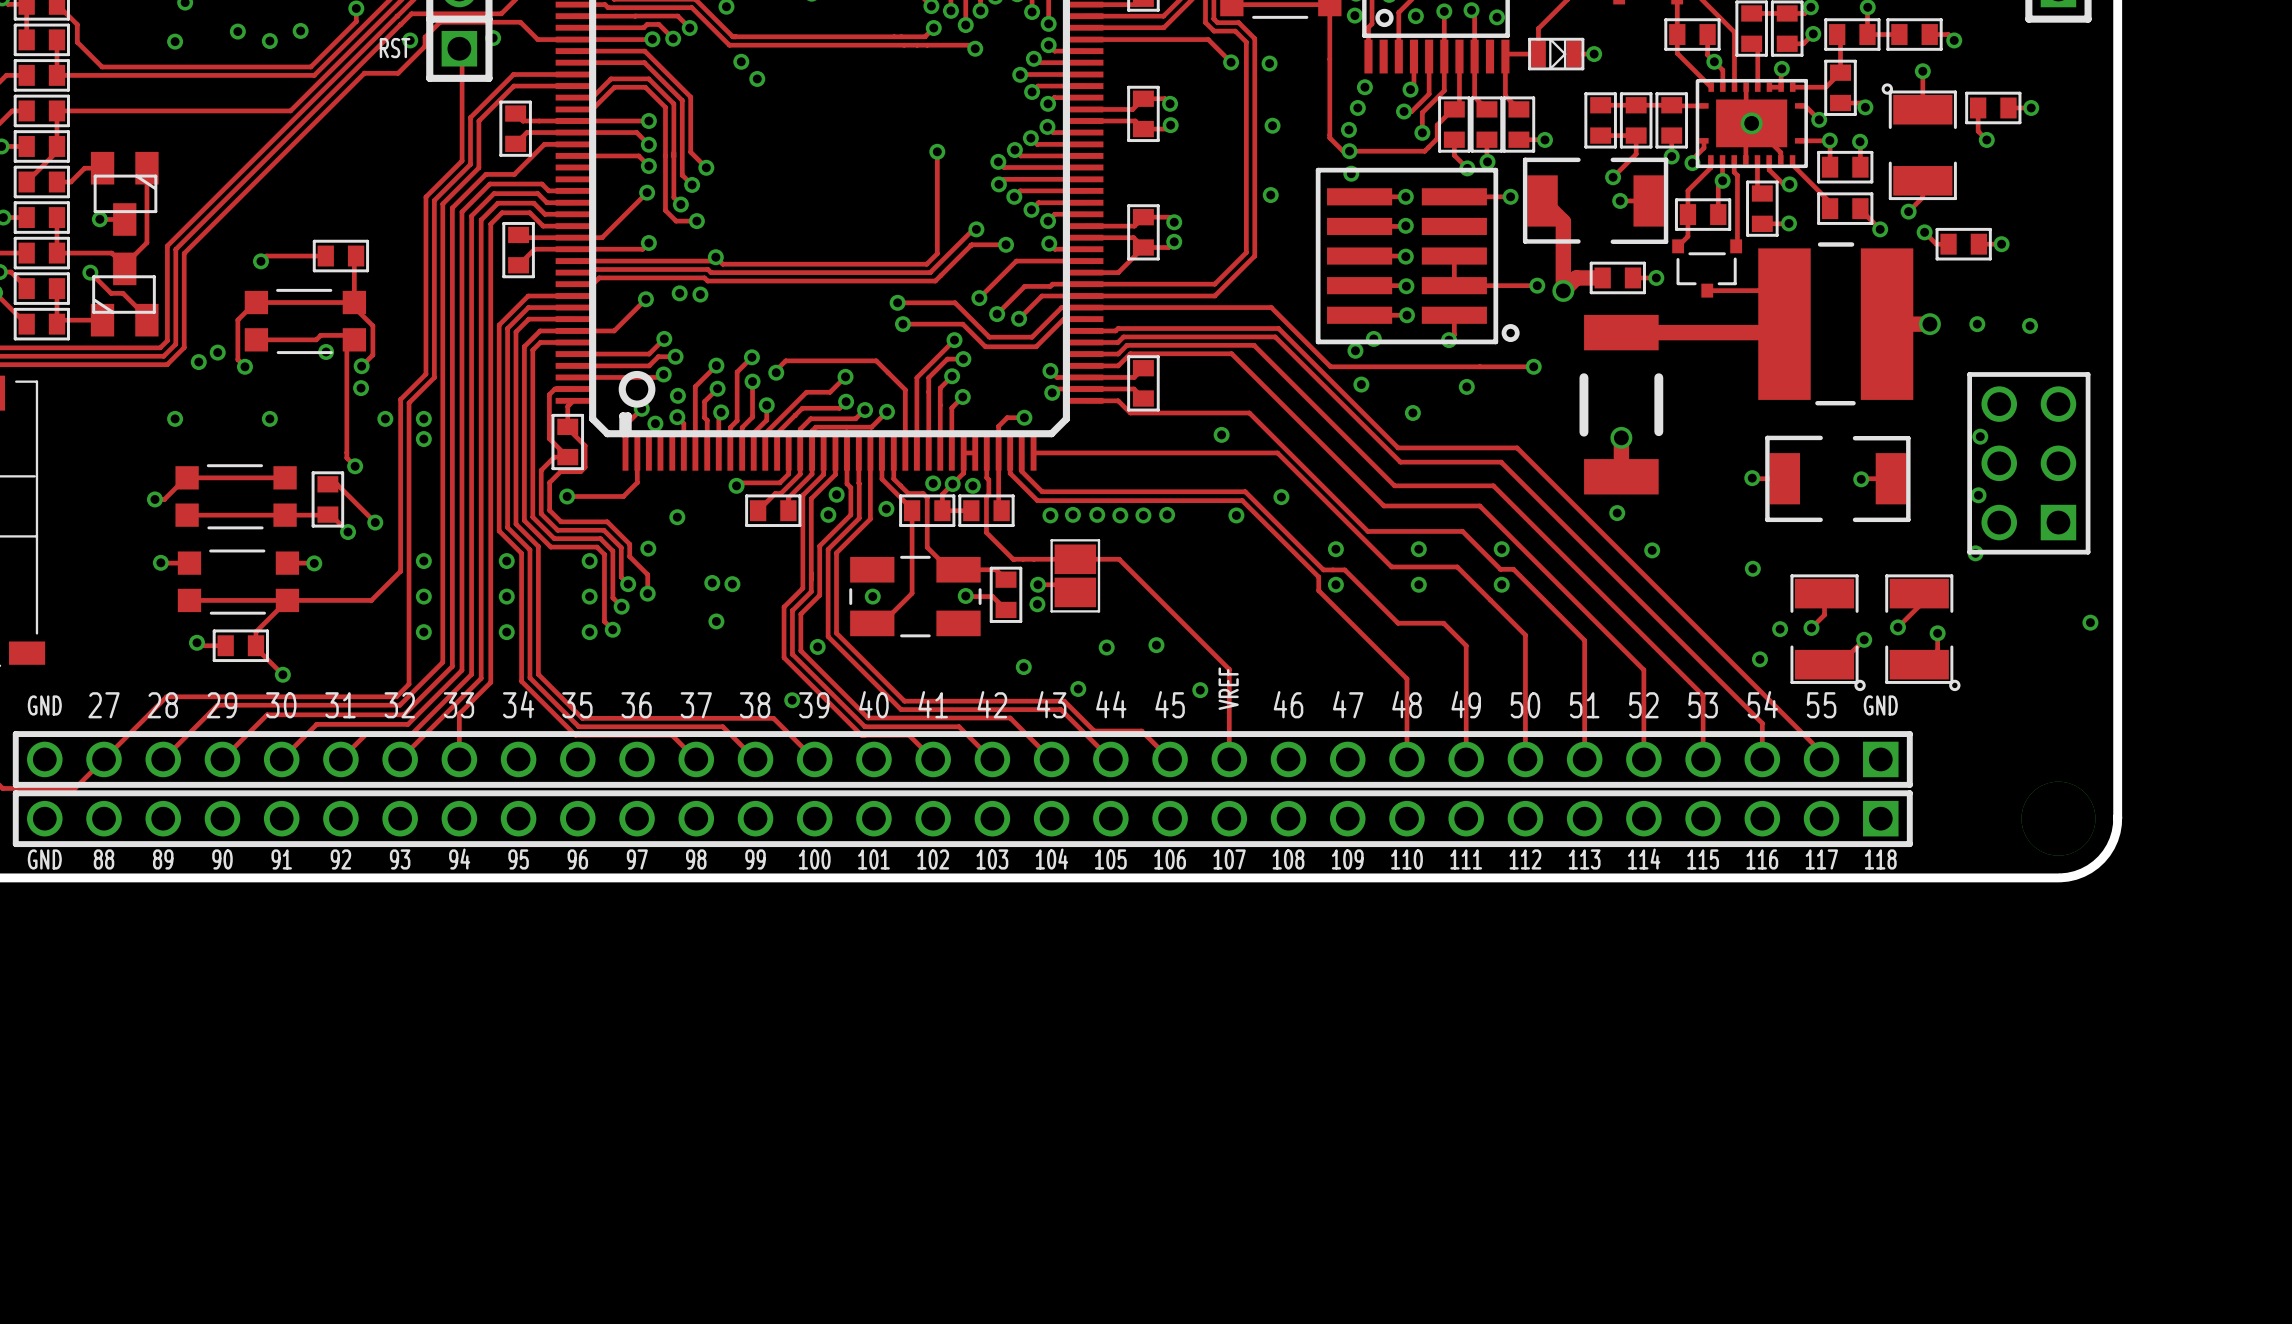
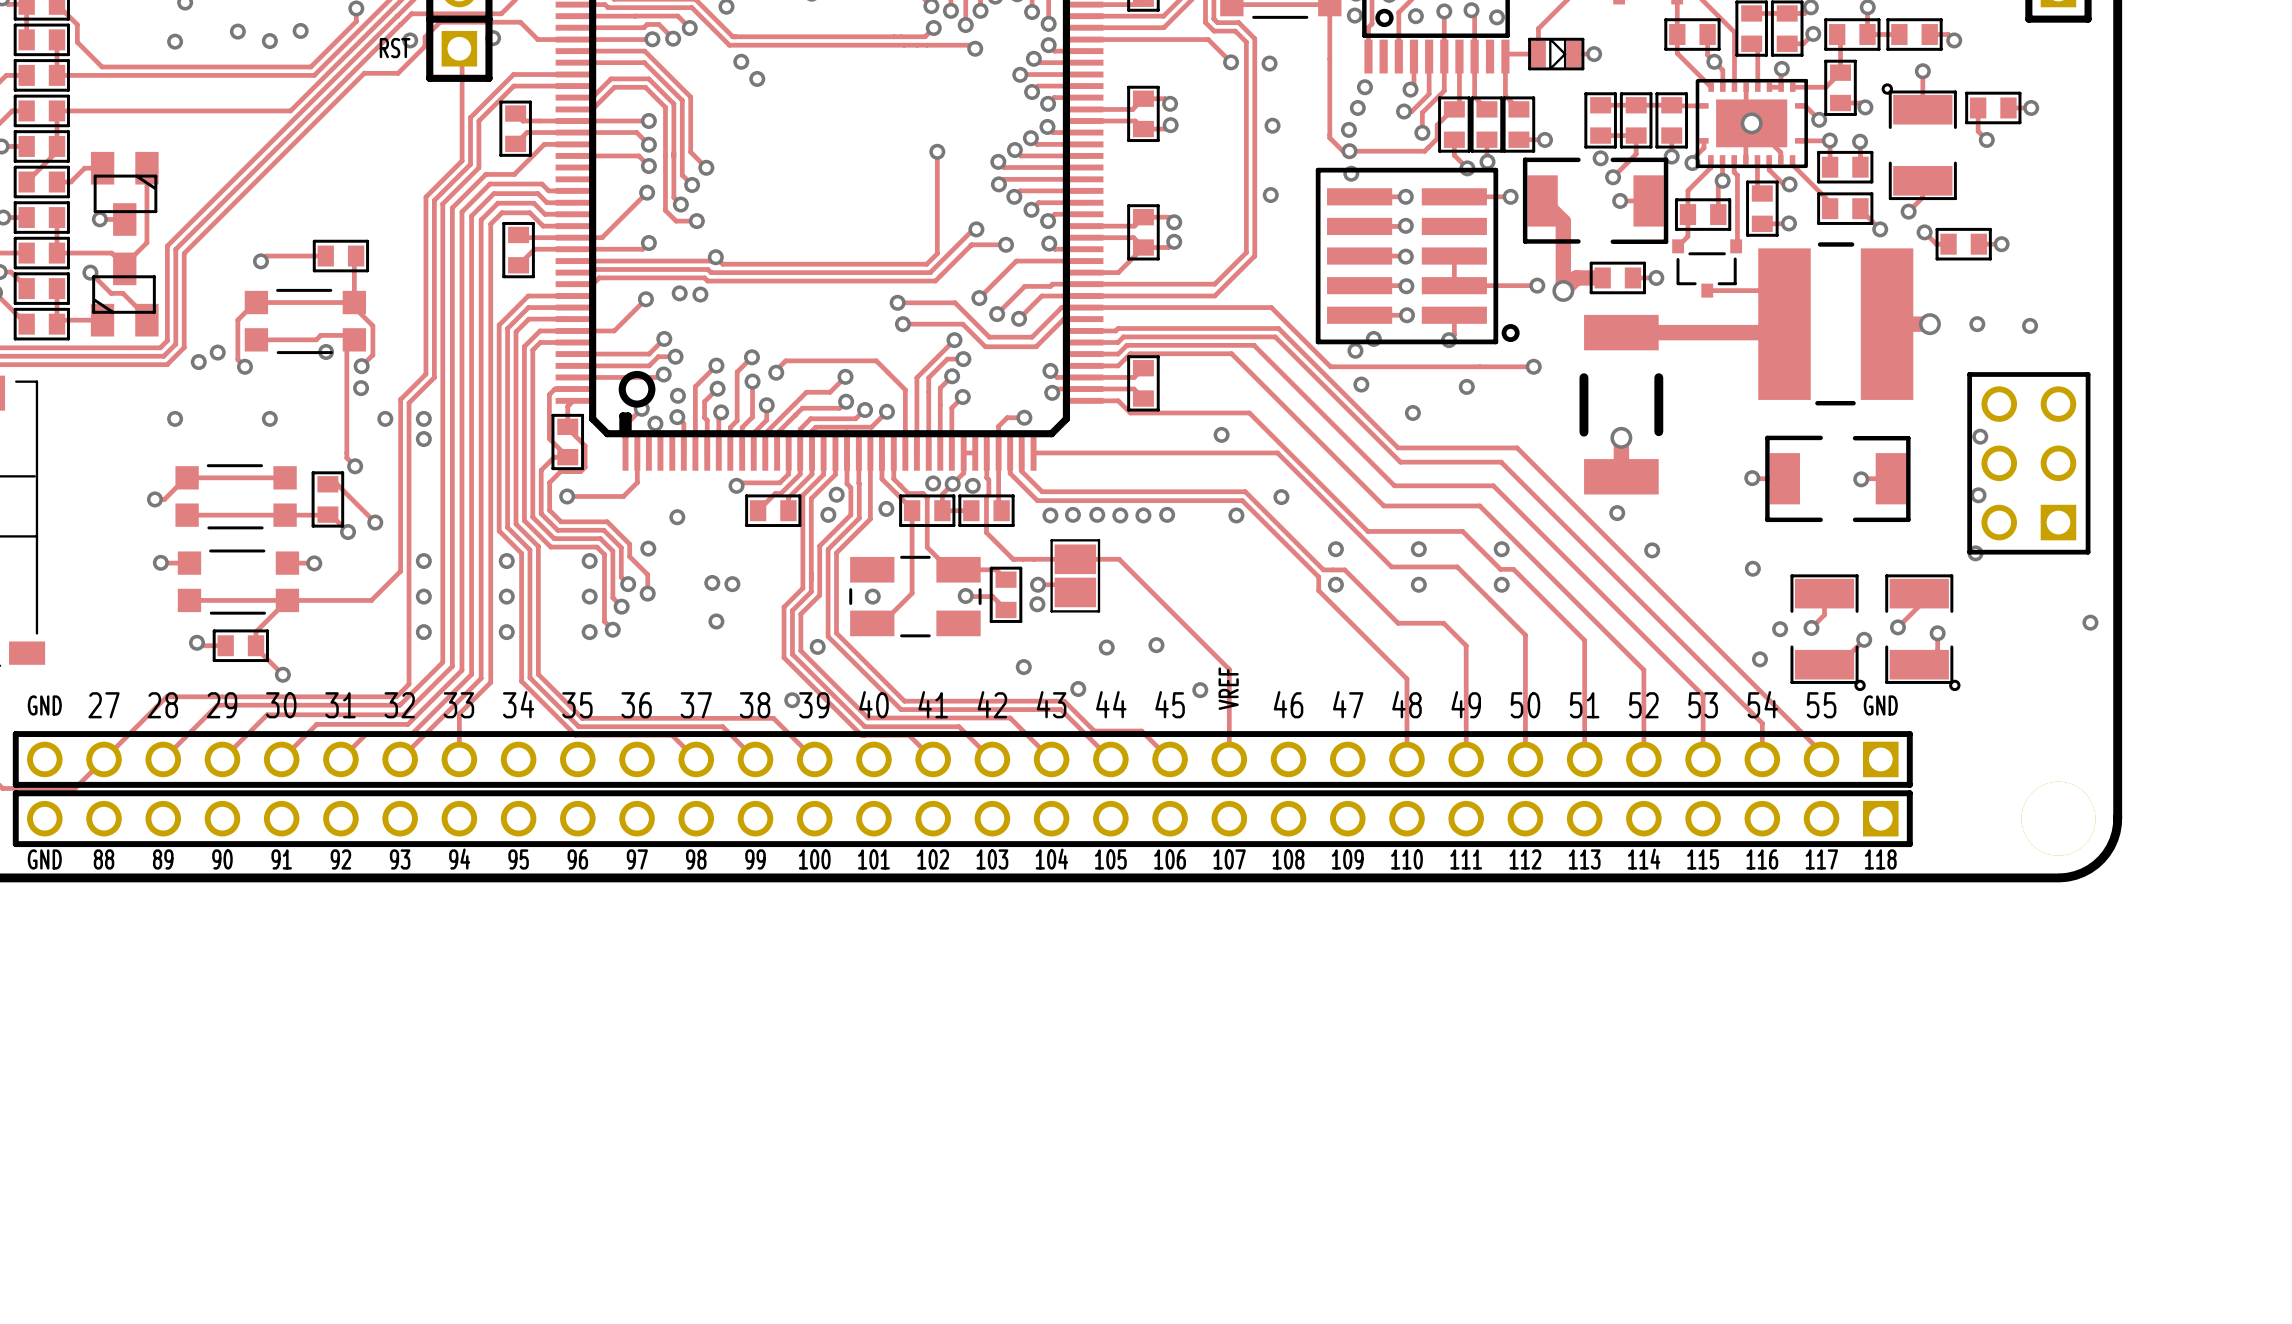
via: none -> (1600, 158)

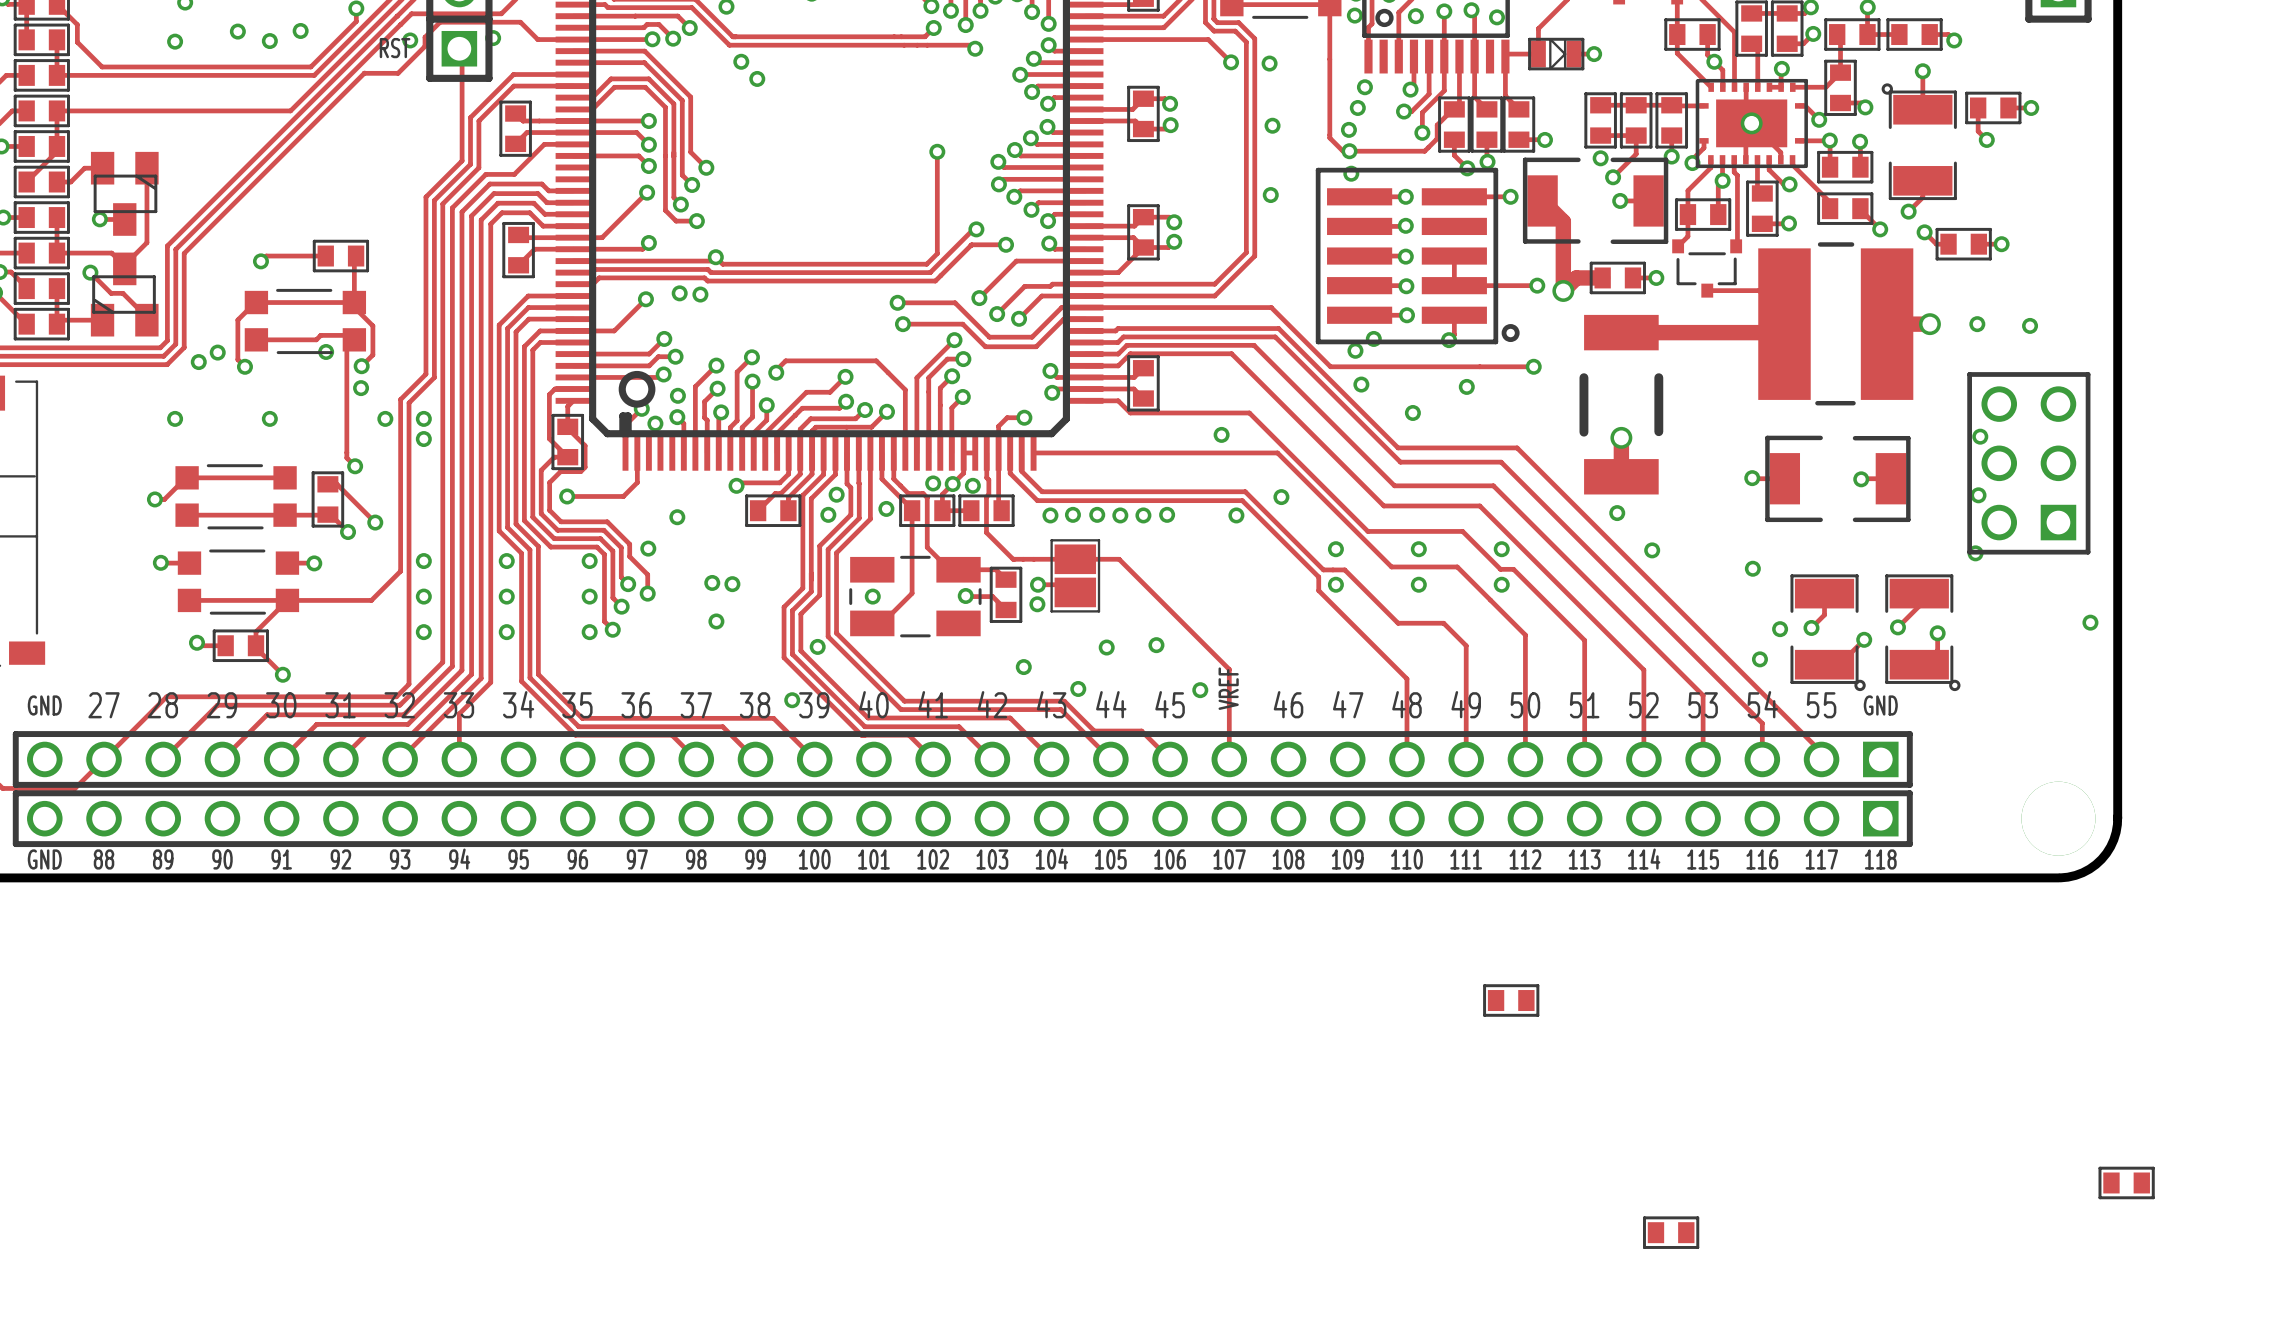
part: none -> (1511, 1000)
part: none -> (2126, 1182)
part: none -> (1671, 1232)

